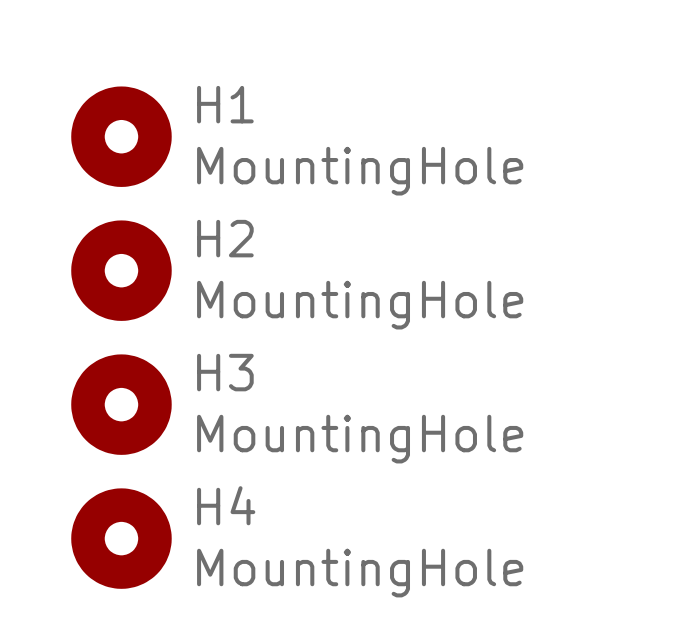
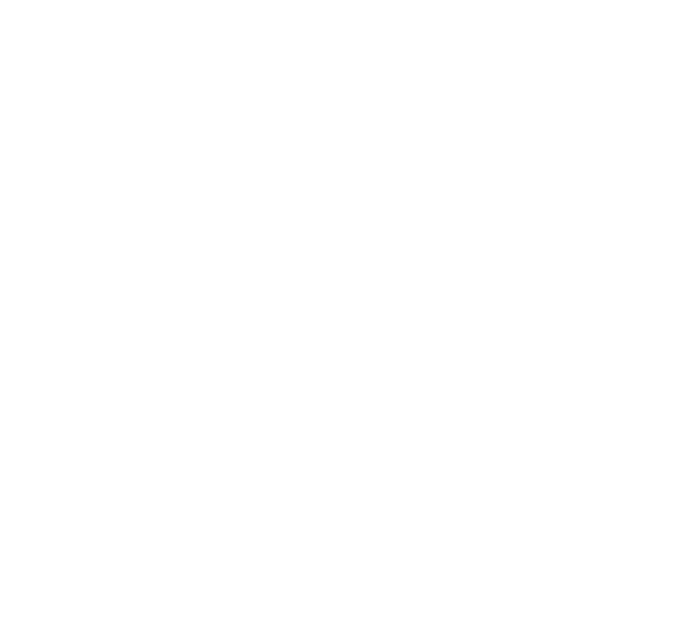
H1: MountingHole (121, 136) -> none
H2: MountingHole (121, 270) -> none
H3: MountingHole (121, 404) -> none
H4: MountingHole (121, 538) -> none

